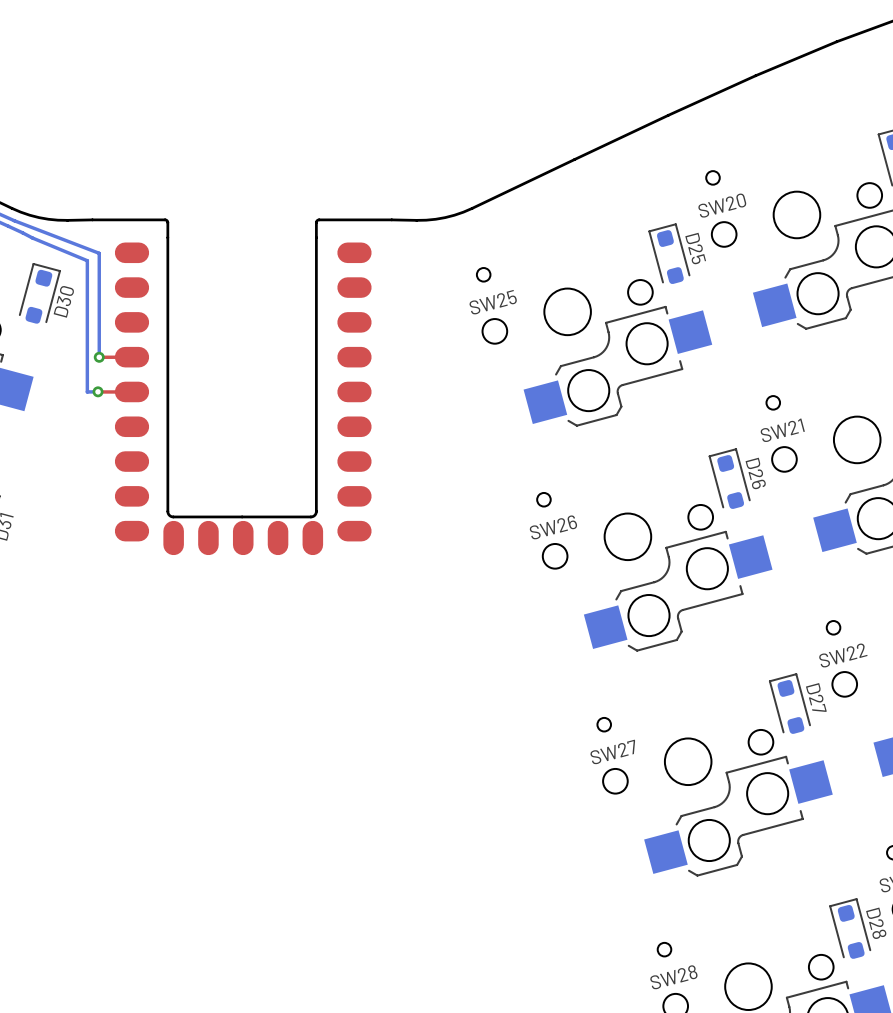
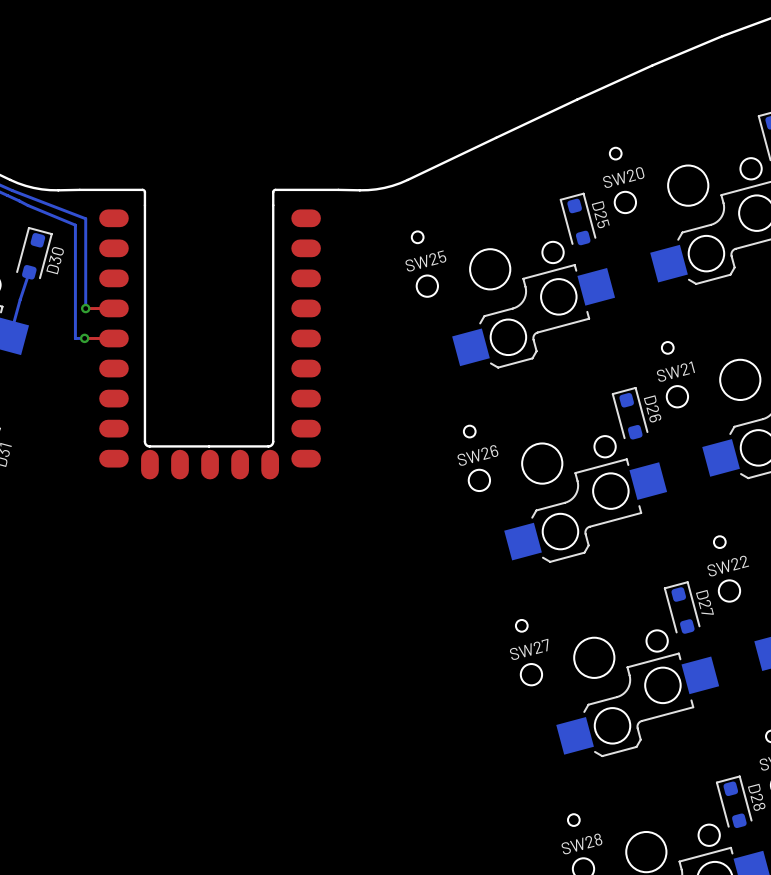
bottom track: none -> (29, 272) (10, 336)

